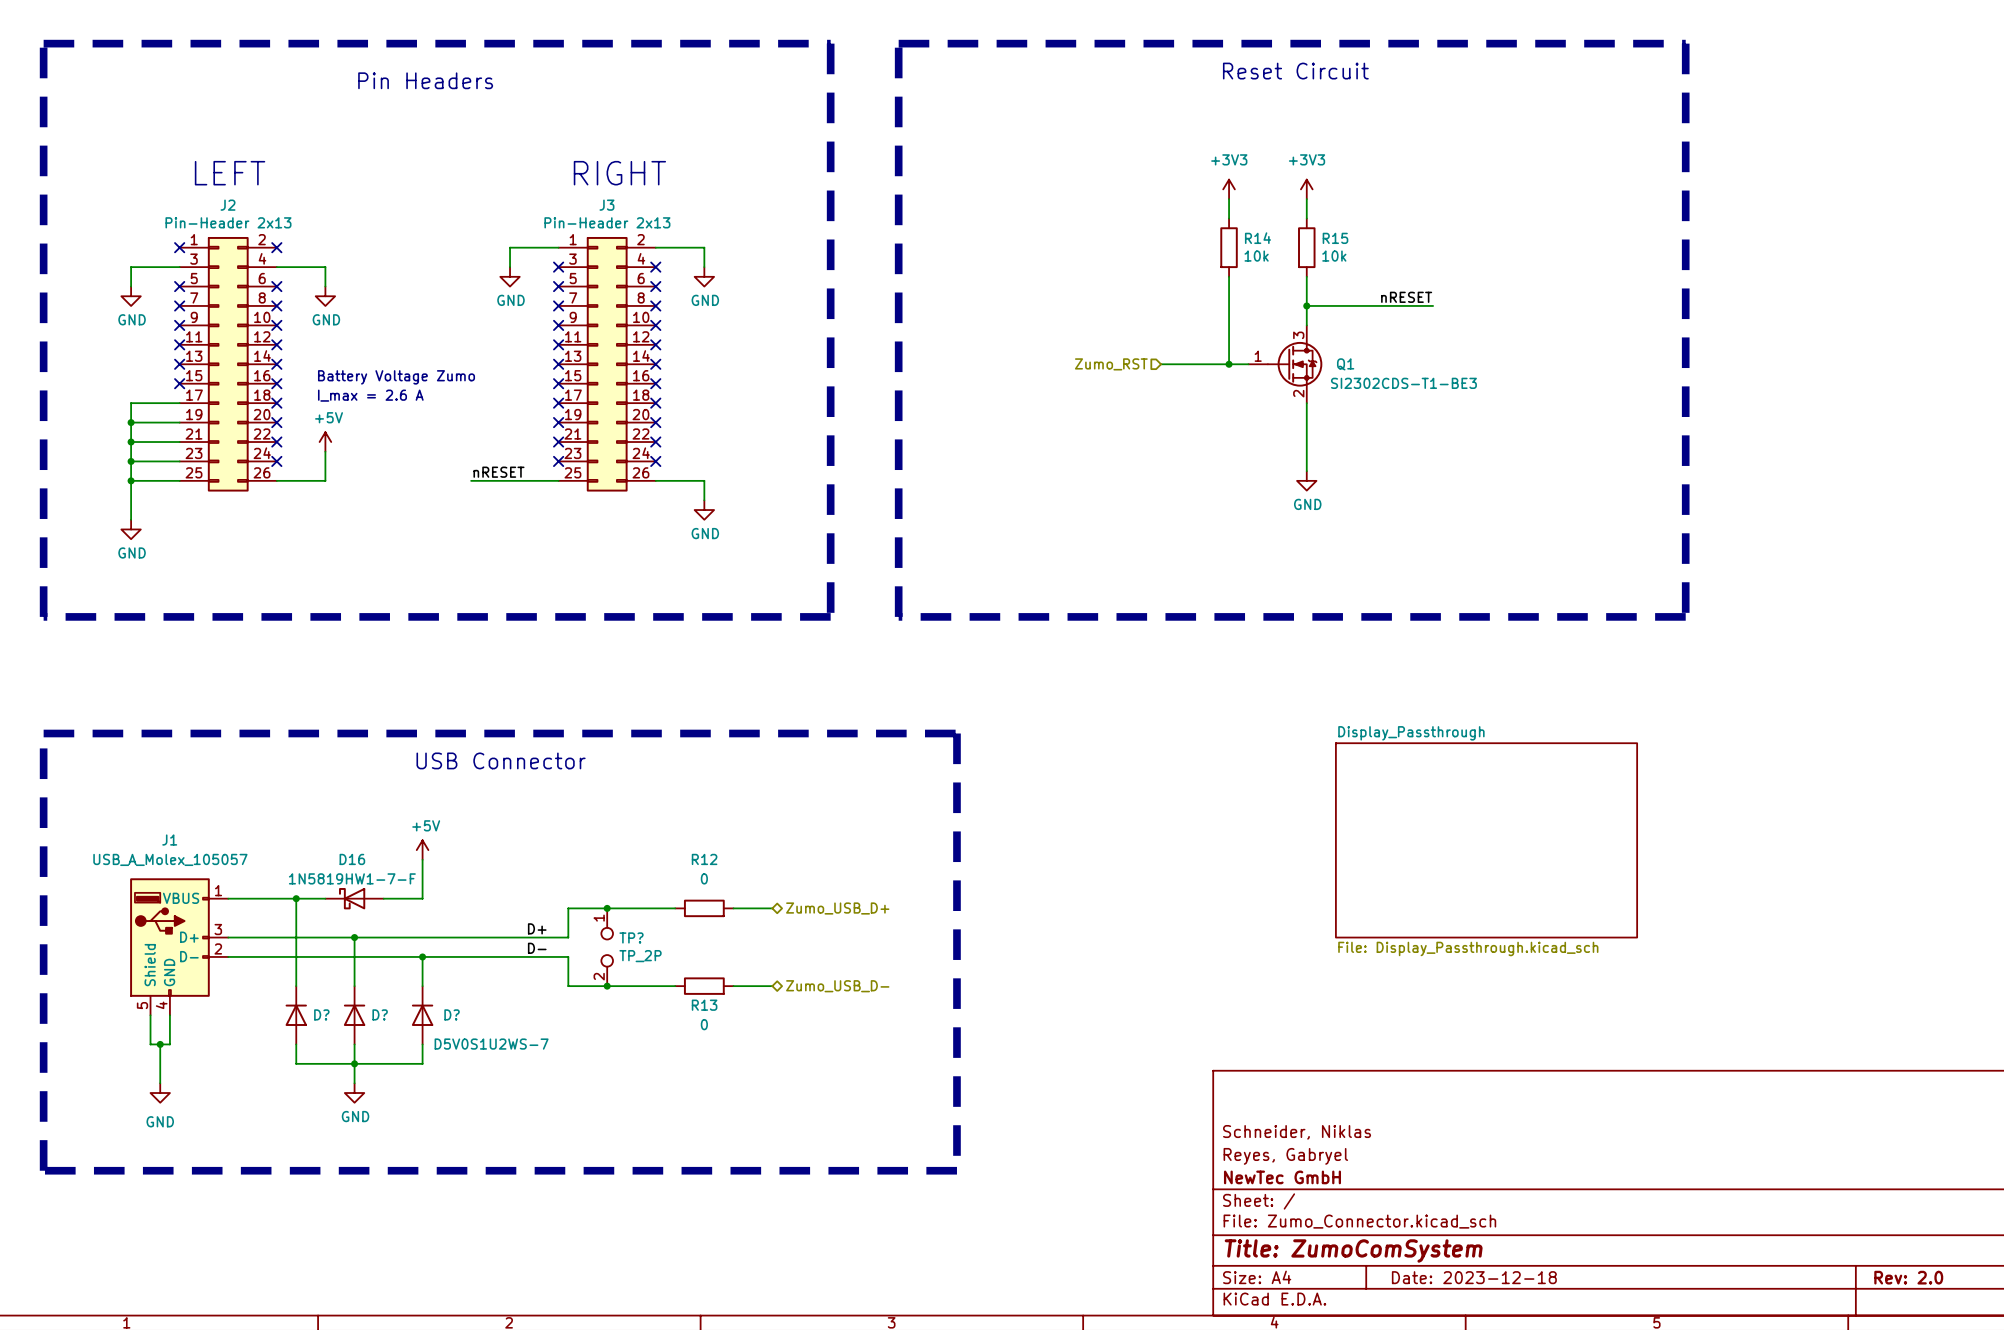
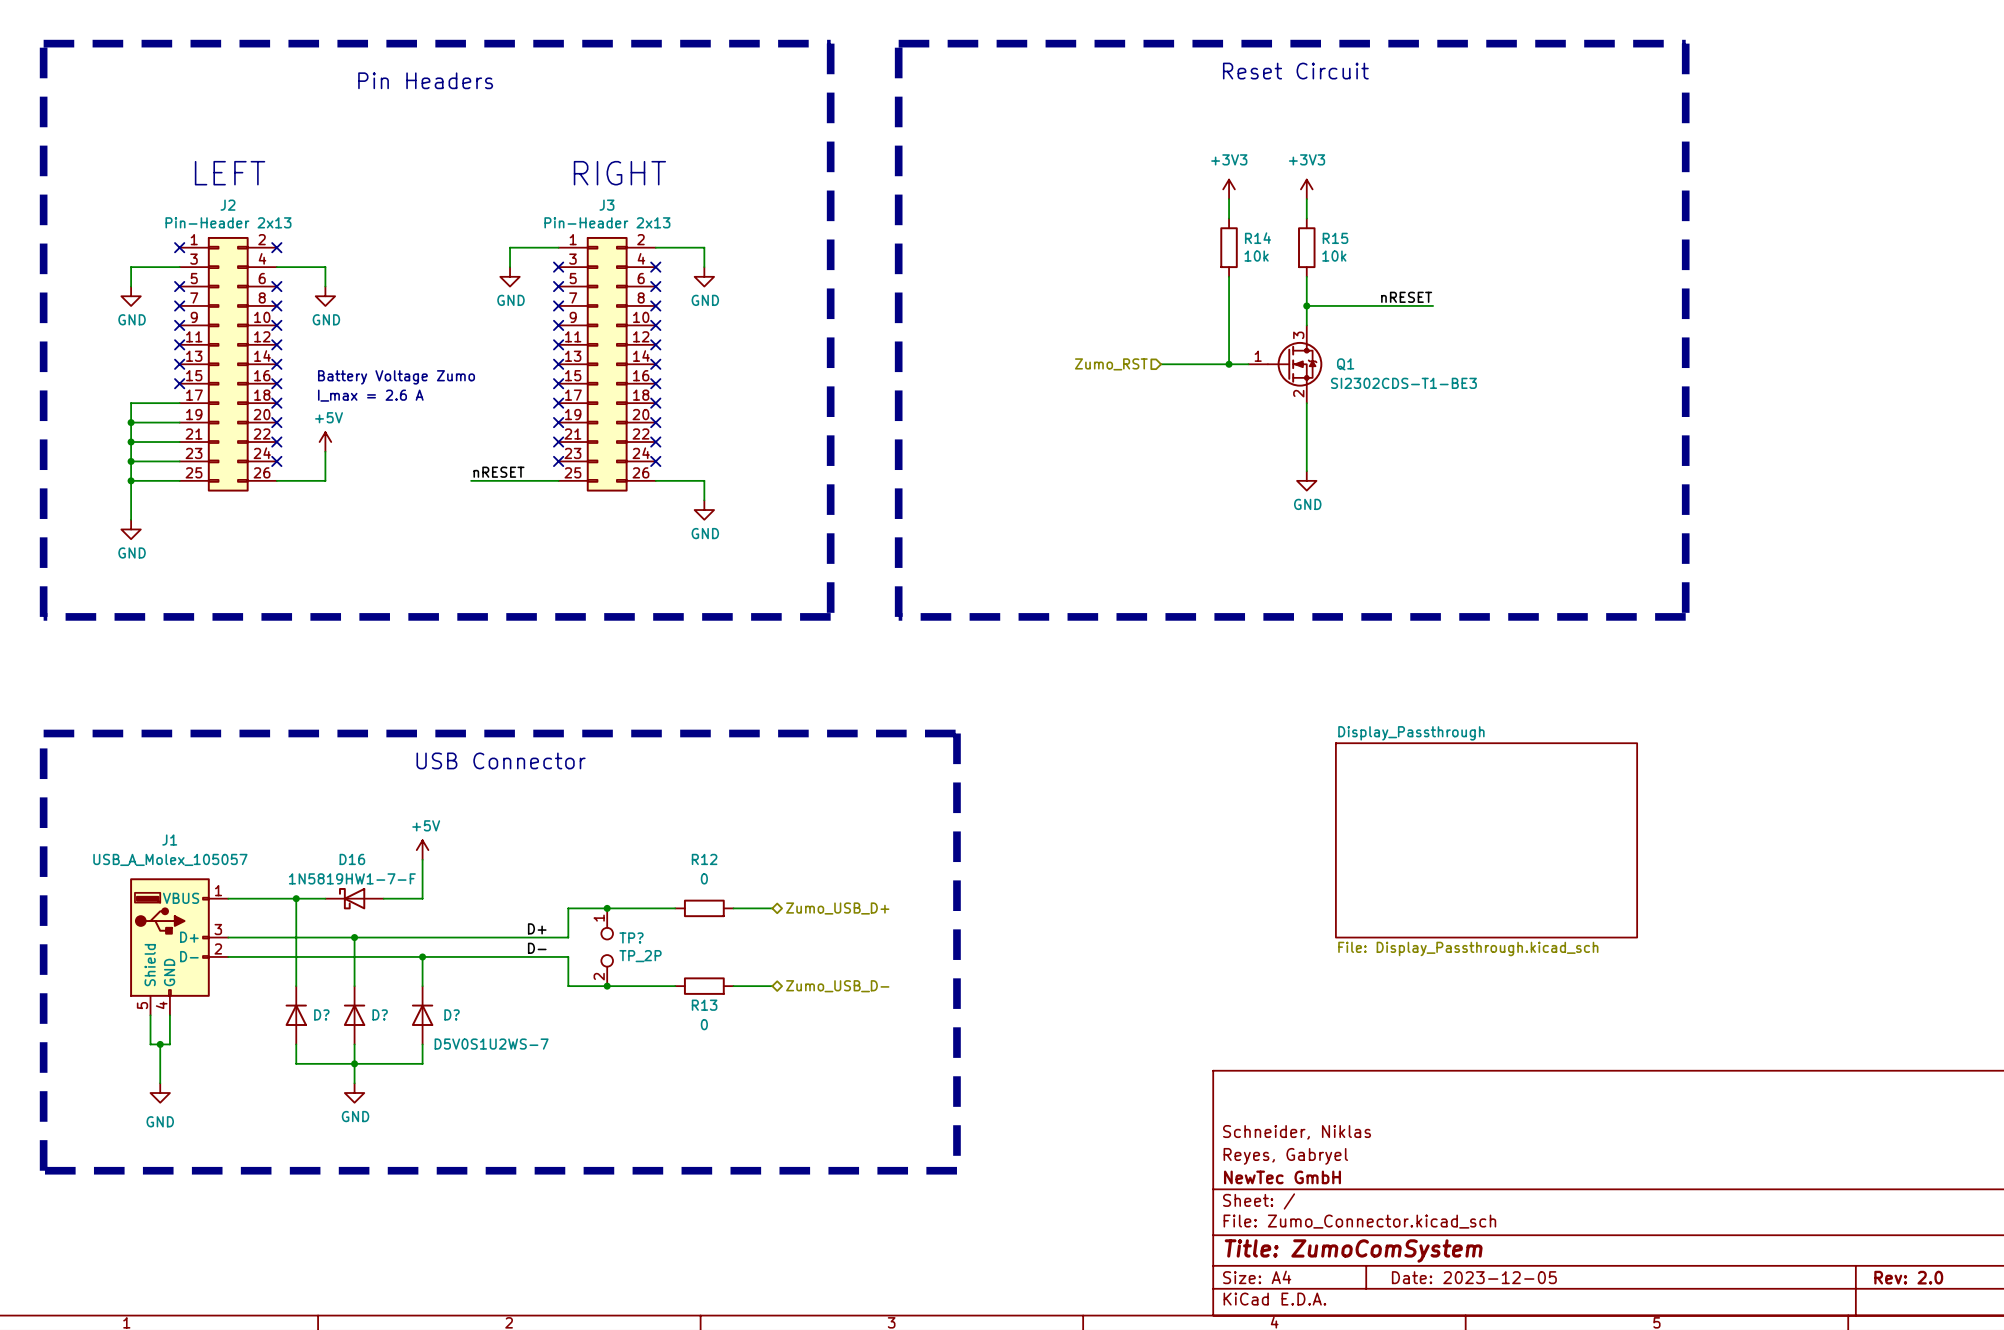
title block: Date: 2023-12-18 (1474, 1277) -> Date: 2023-12-05 (1474, 1277)

